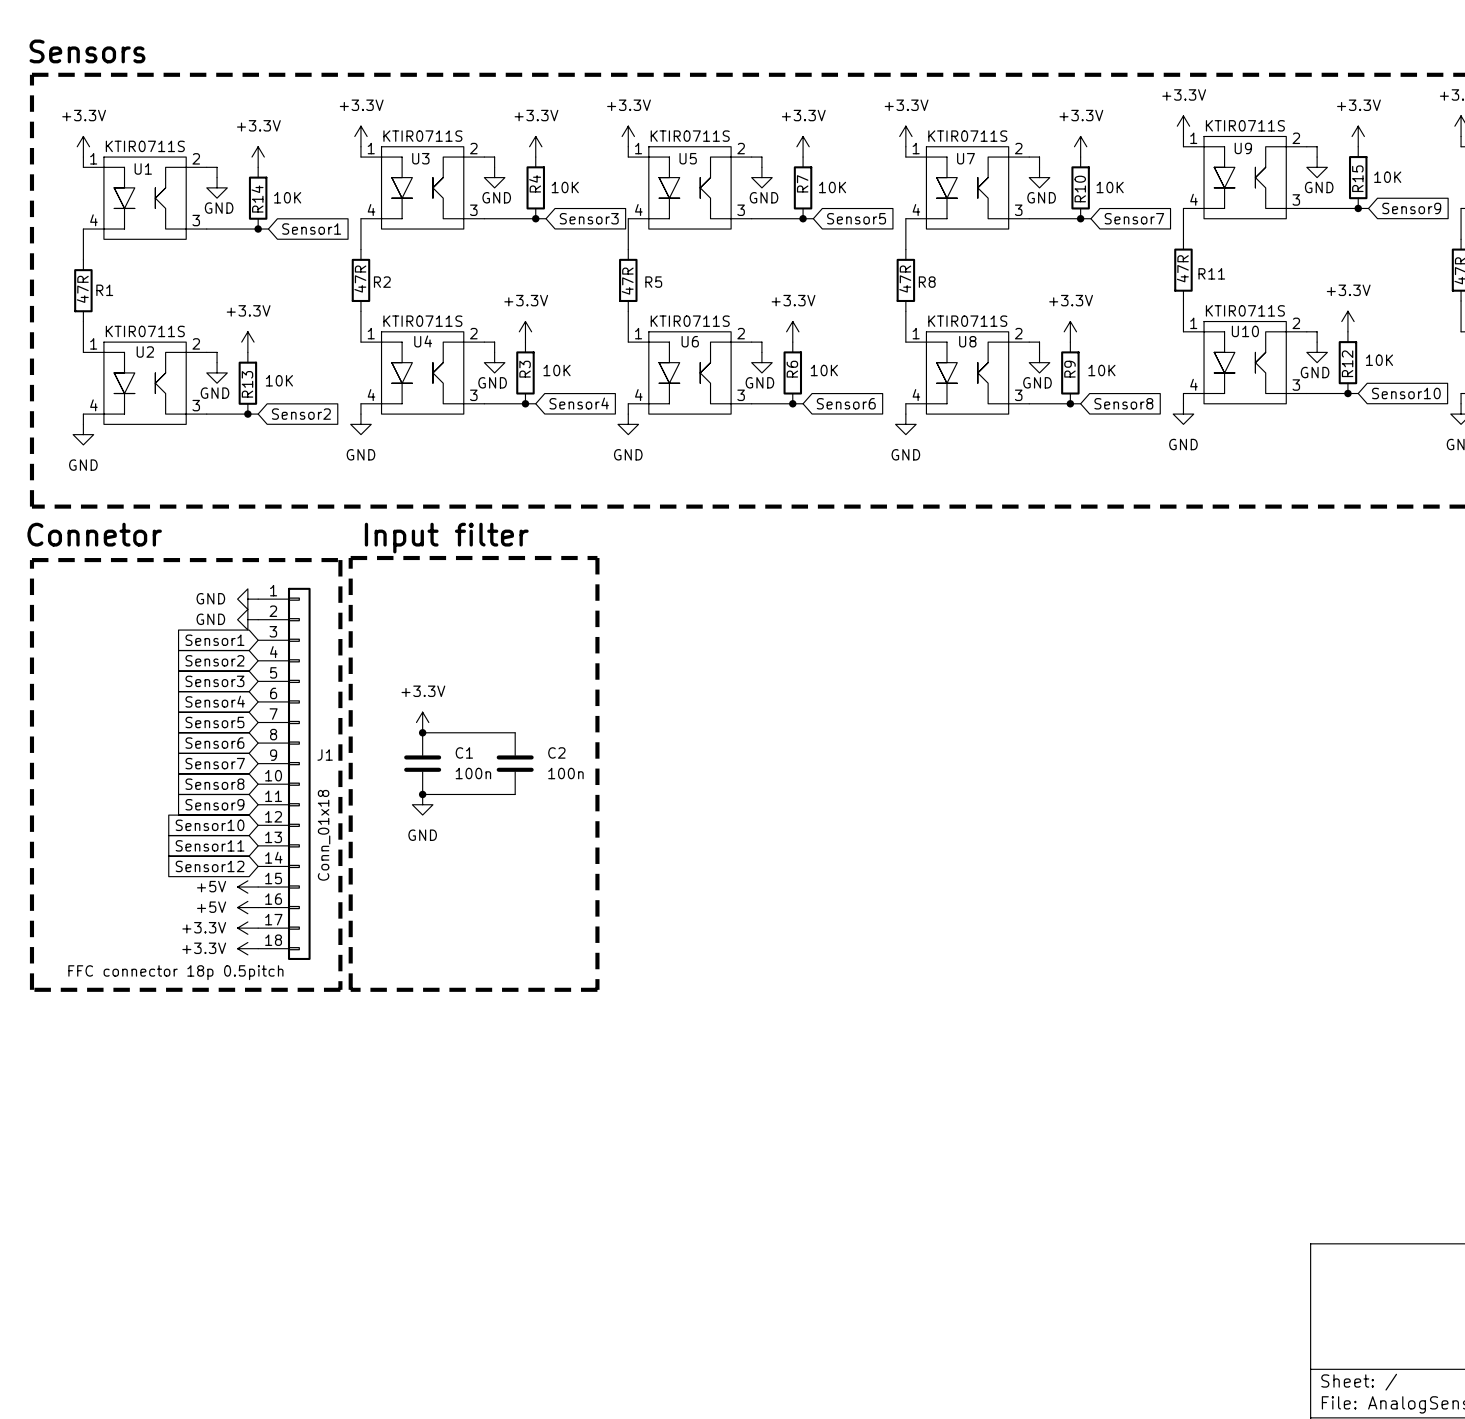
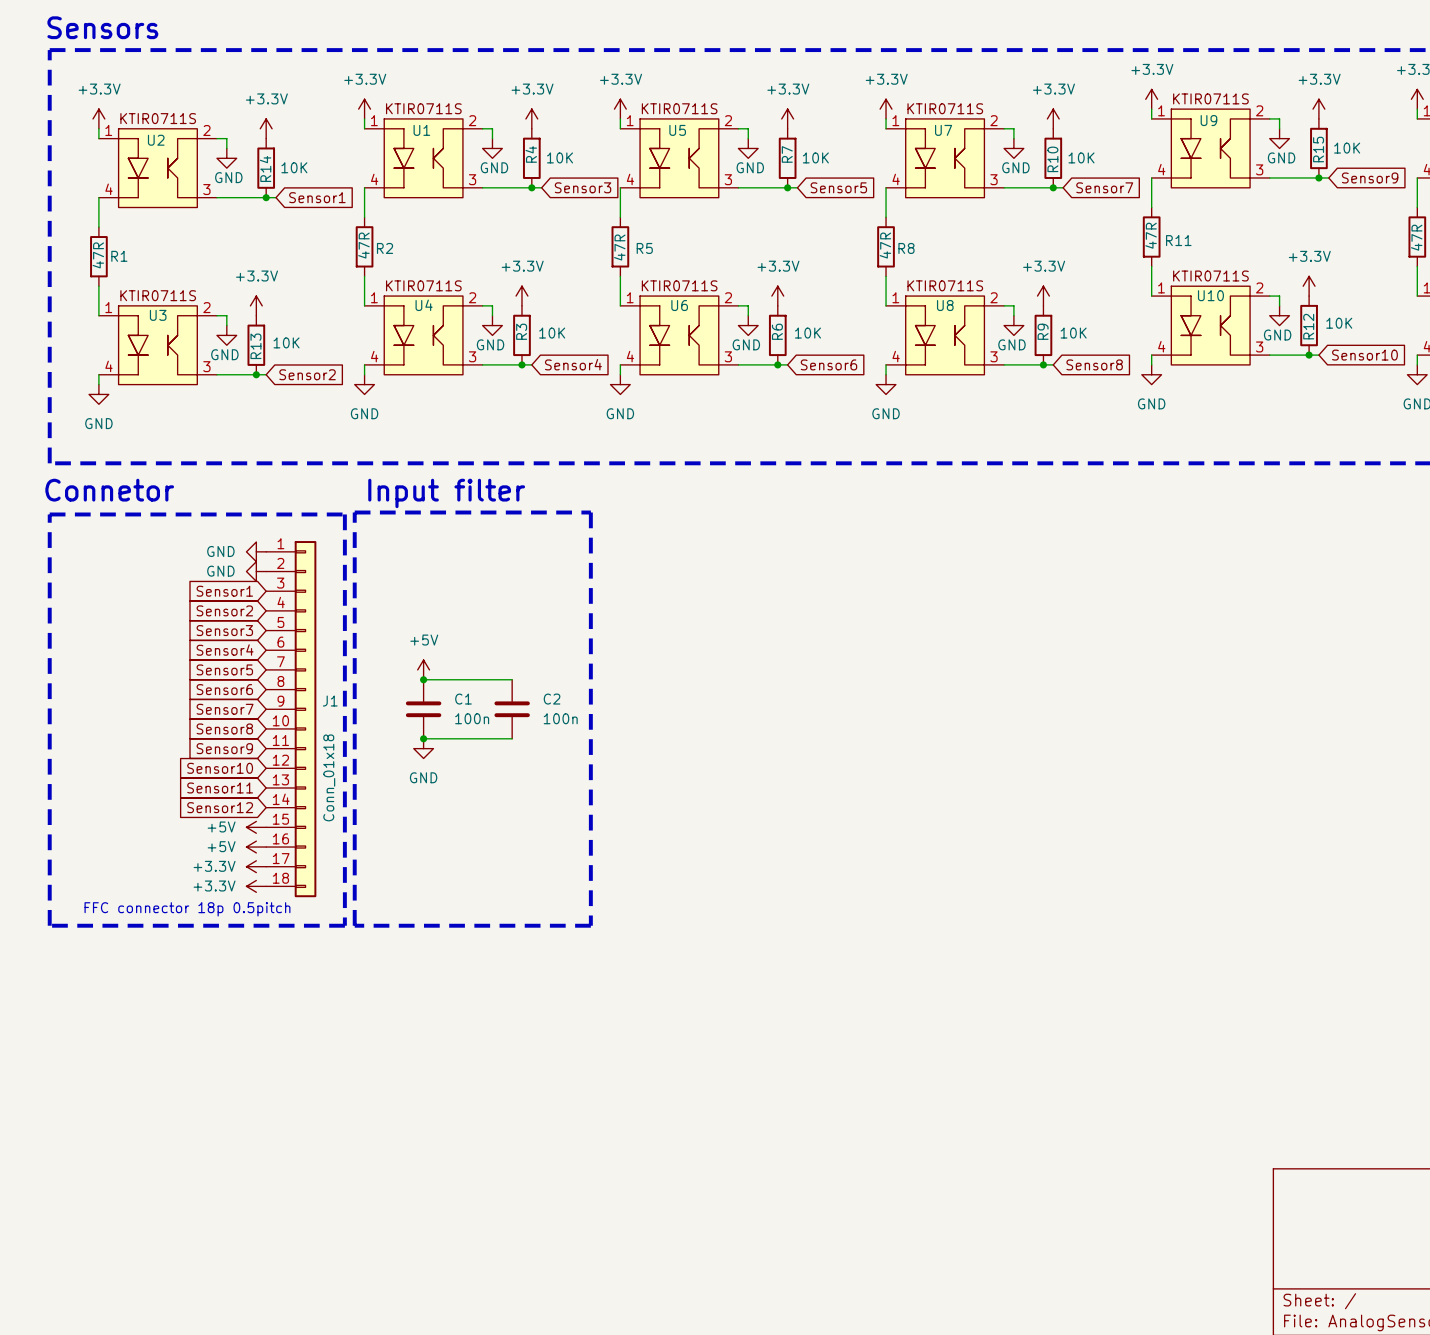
U3 name: U3 (420, 158) -> U1 (421, 130)
U1 name: U1 (143, 169) -> U2 (156, 140)
U2 name: U2 (145, 352) -> U3 (158, 315)
power symbol: +3.3V (422, 722) -> +5V (423, 669)

